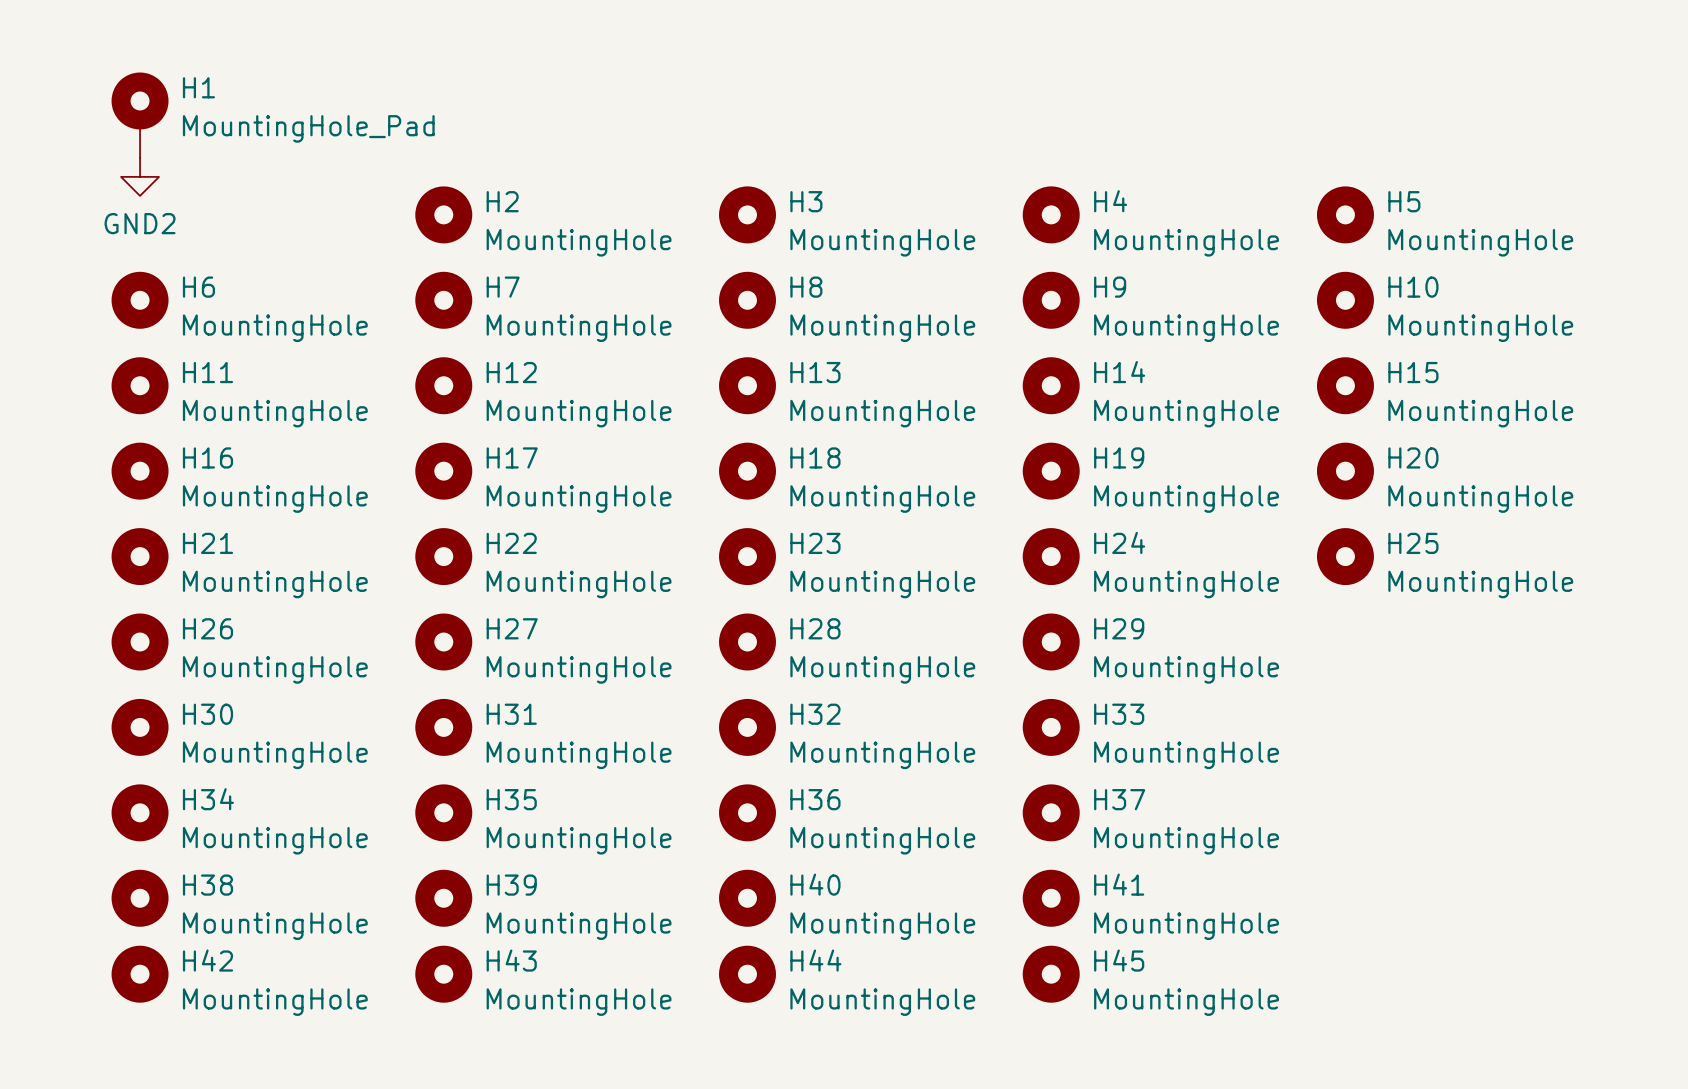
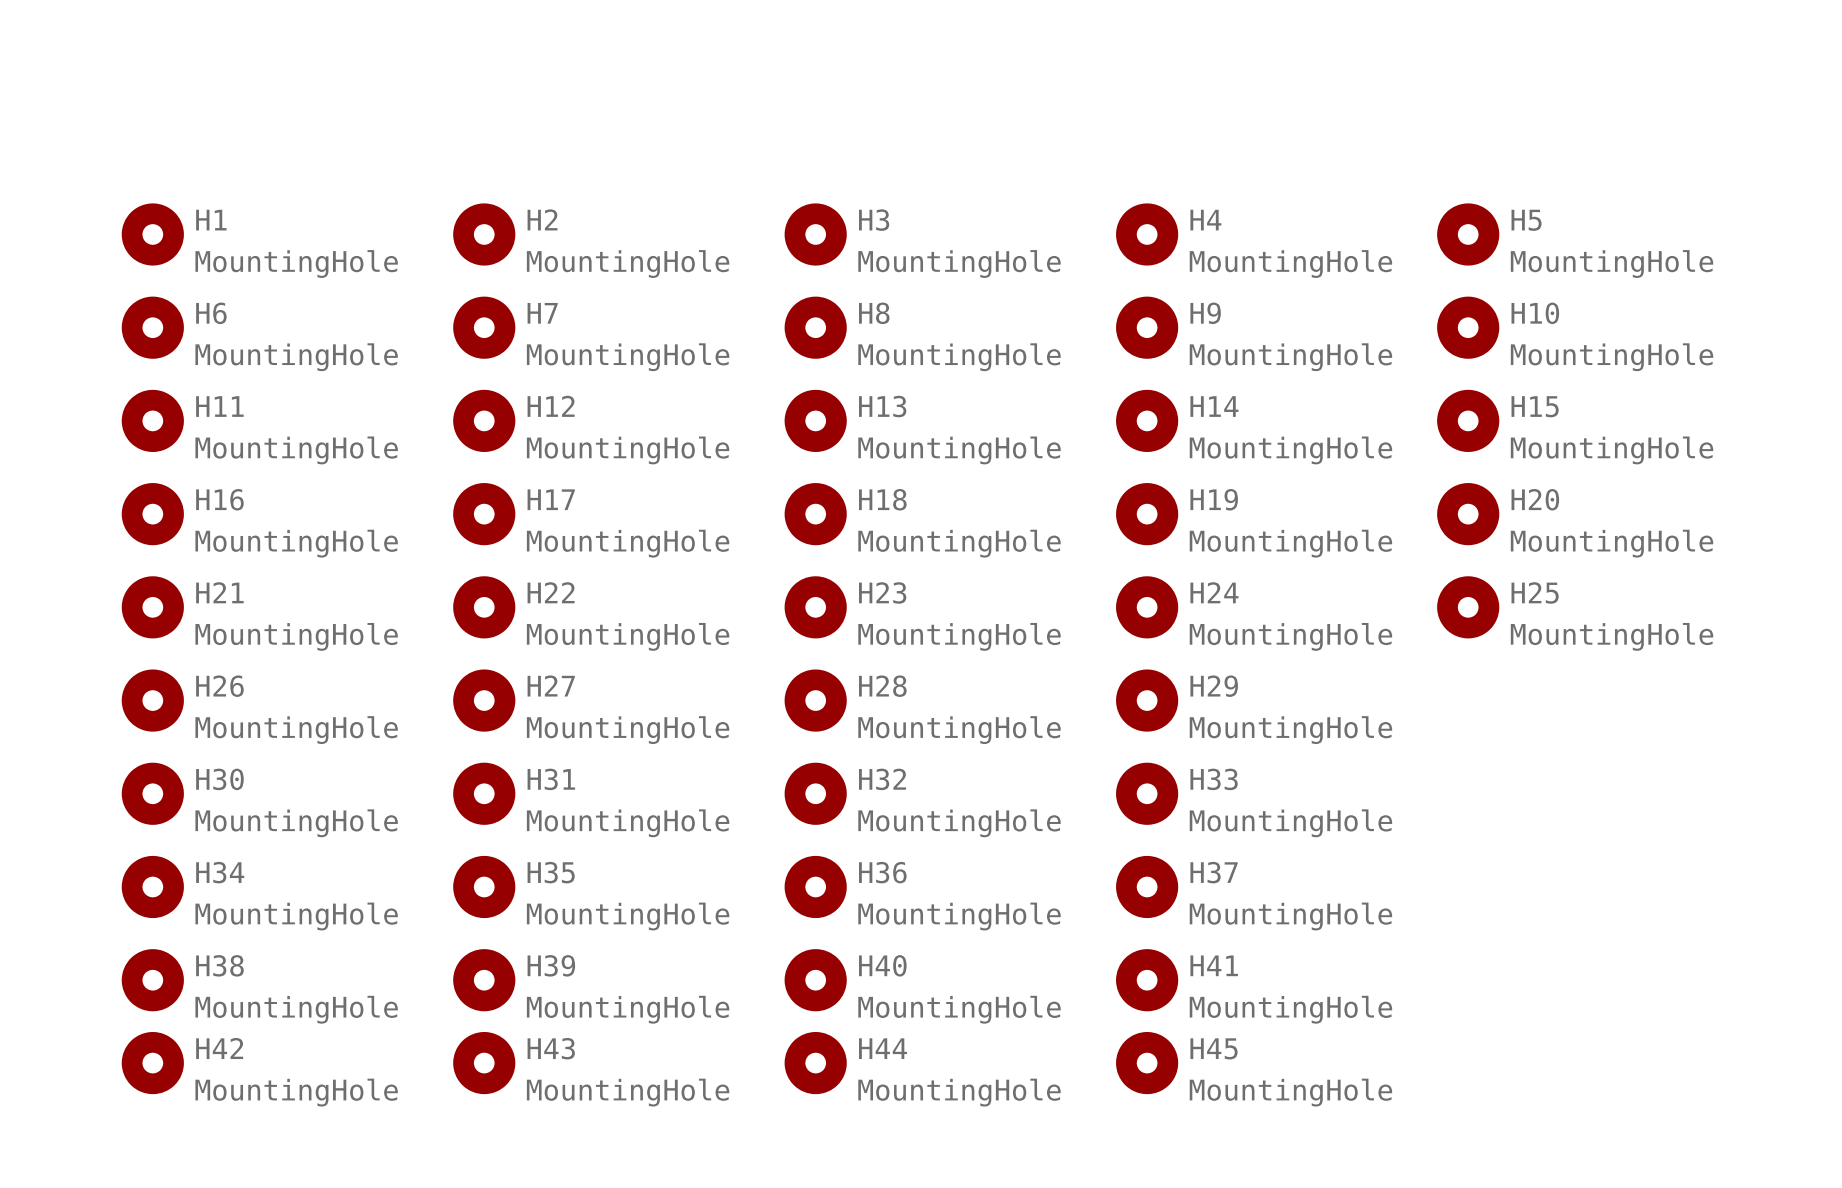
H1 symbol: [111, 72, 169, 158] -> [121, 203, 184, 266]
H1 value: MountingHole_Pad (308, 128) -> MountingHole (296, 264)
power symbol: GND2 (140, 176) -> none

